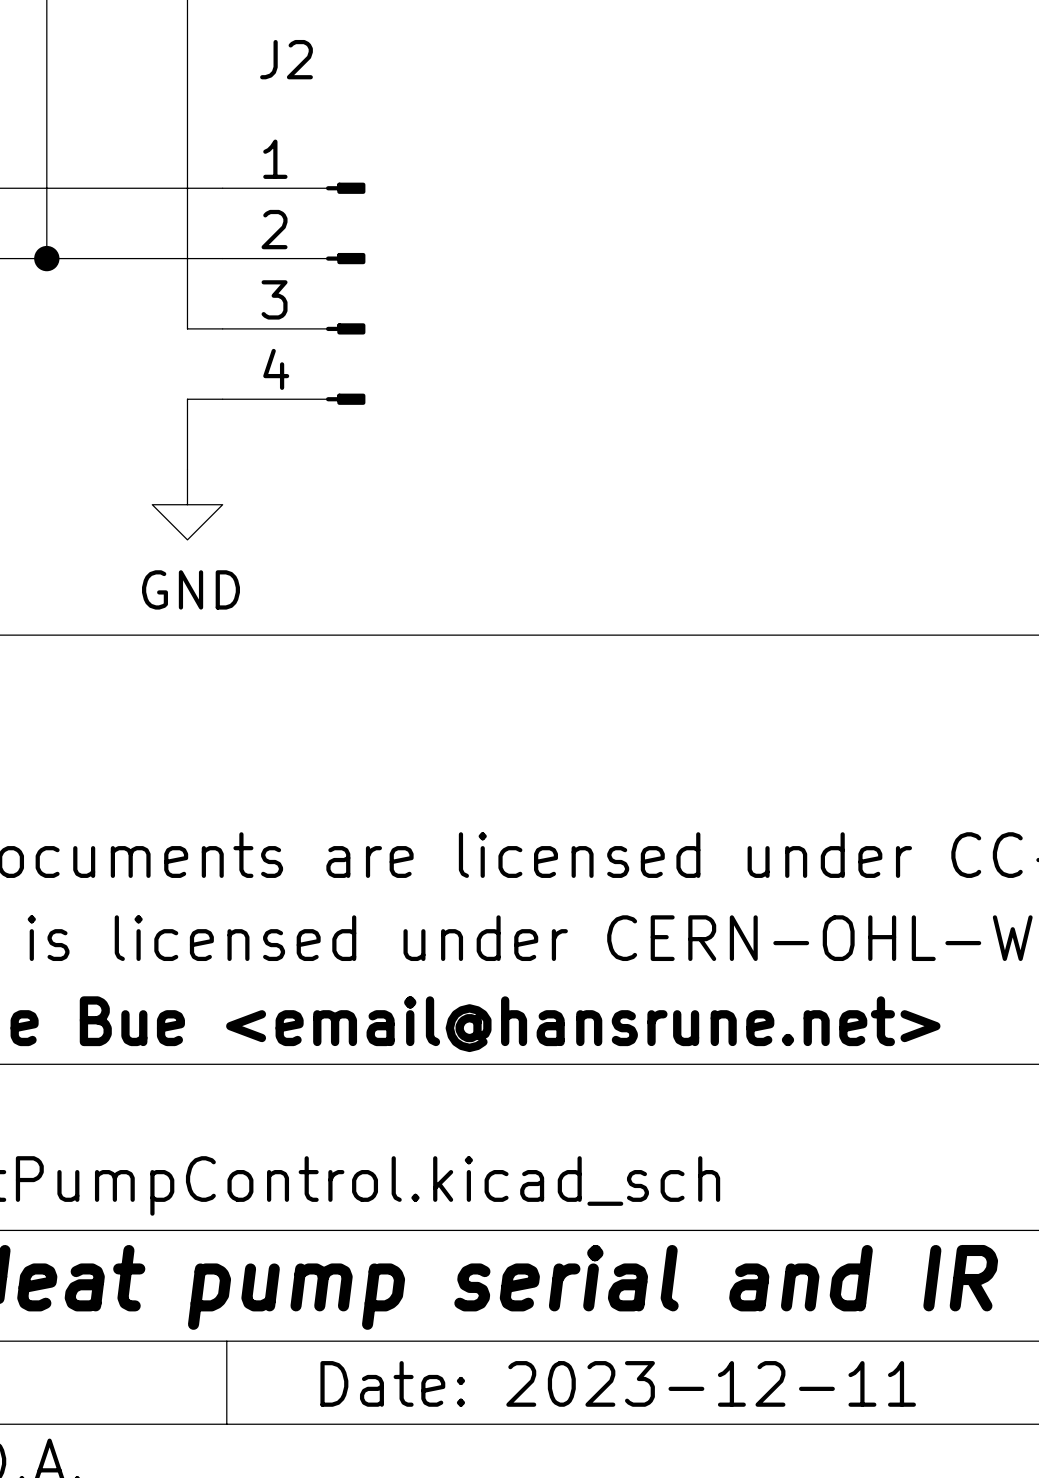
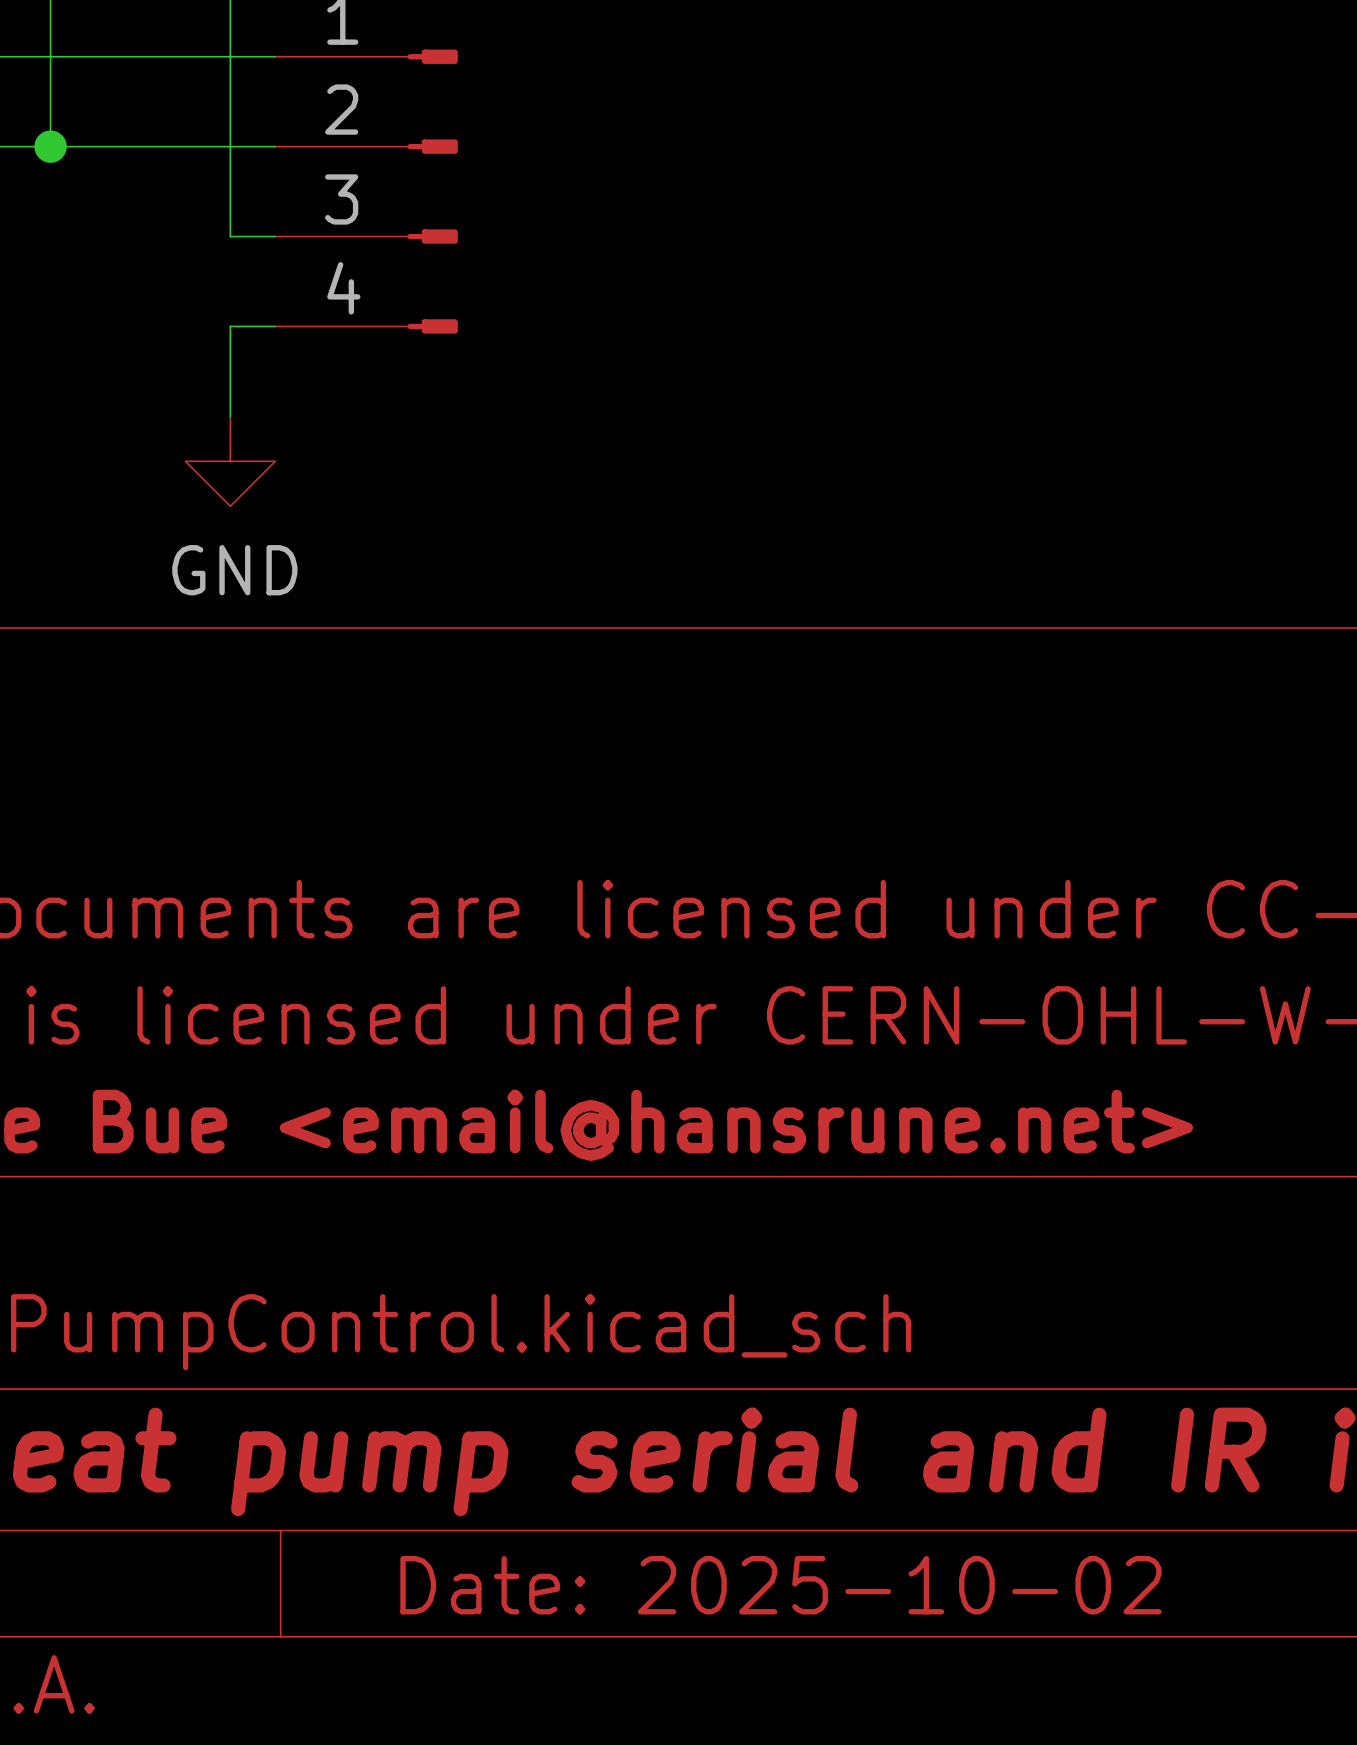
title block: Date: 2023-12-11 (618, 1383) -> Date: 2025-10-02 (780, 1585)

